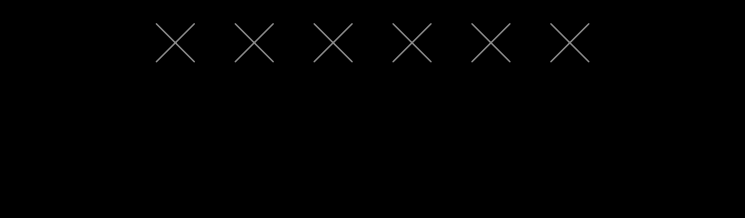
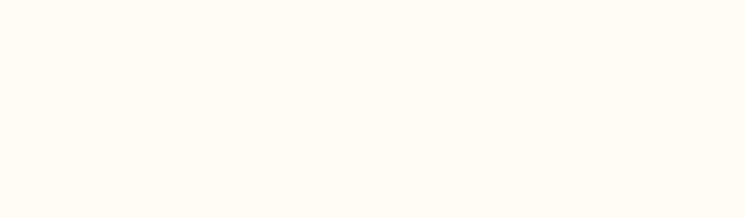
no-connect mark: (175, 42) -> none
no-connect mark: (254, 42) -> none
no-connect mark: (333, 42) -> none
no-connect mark: (412, 42) -> none
no-connect mark: (490, 42) -> none
no-connect mark: (569, 42) -> none

